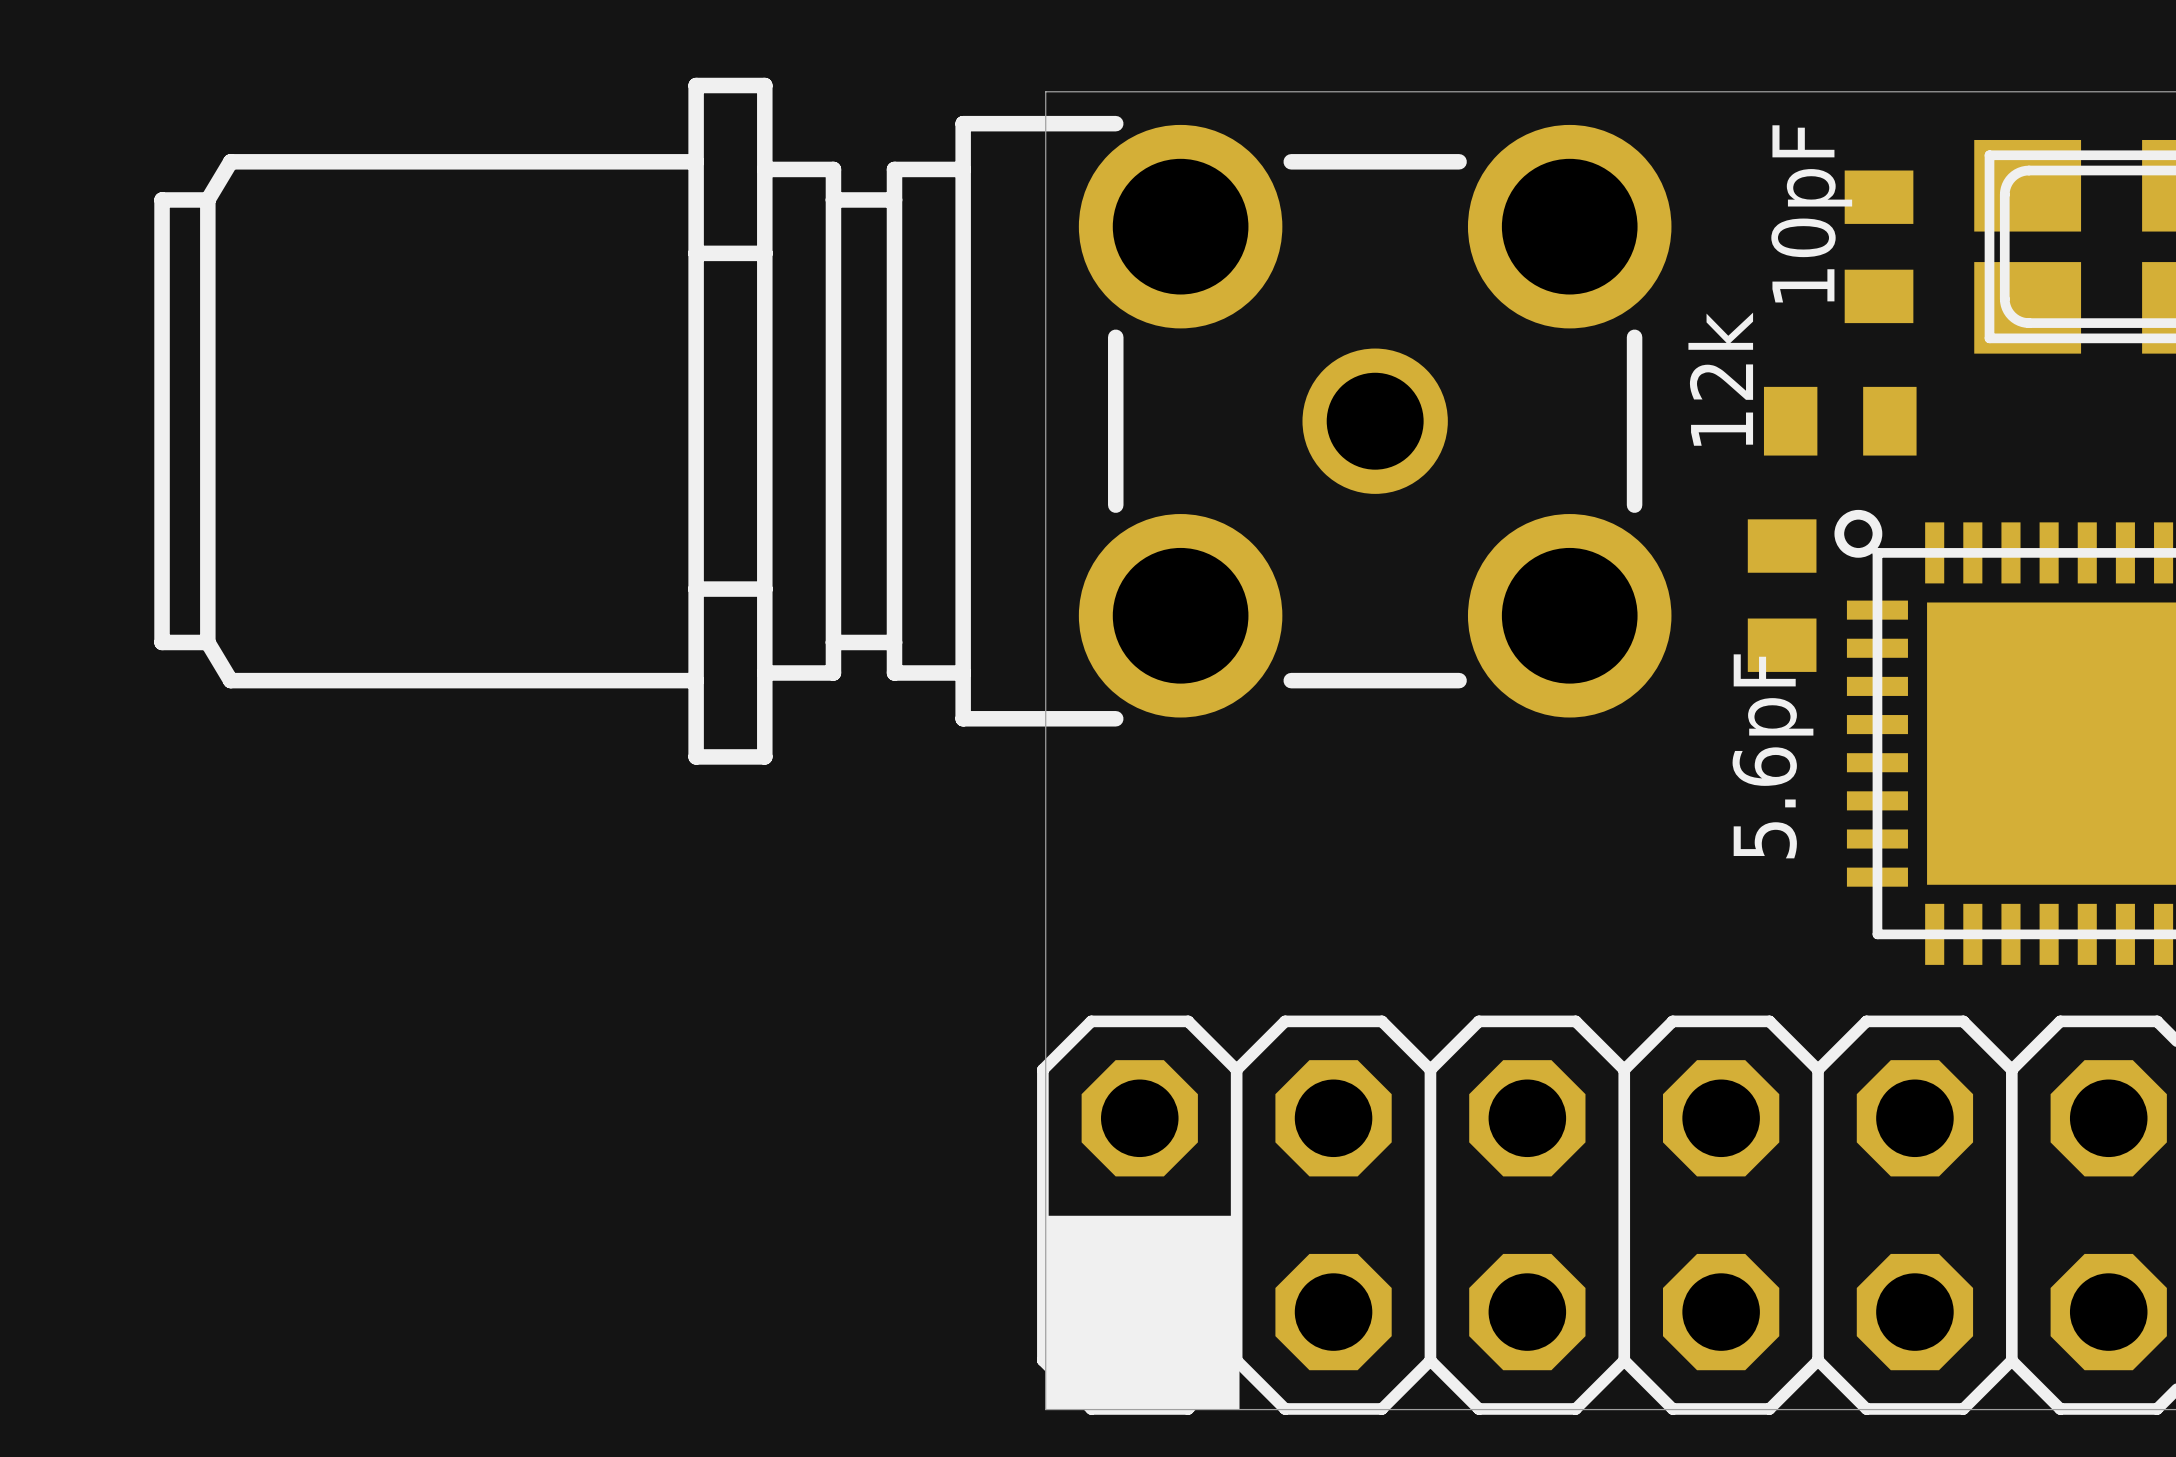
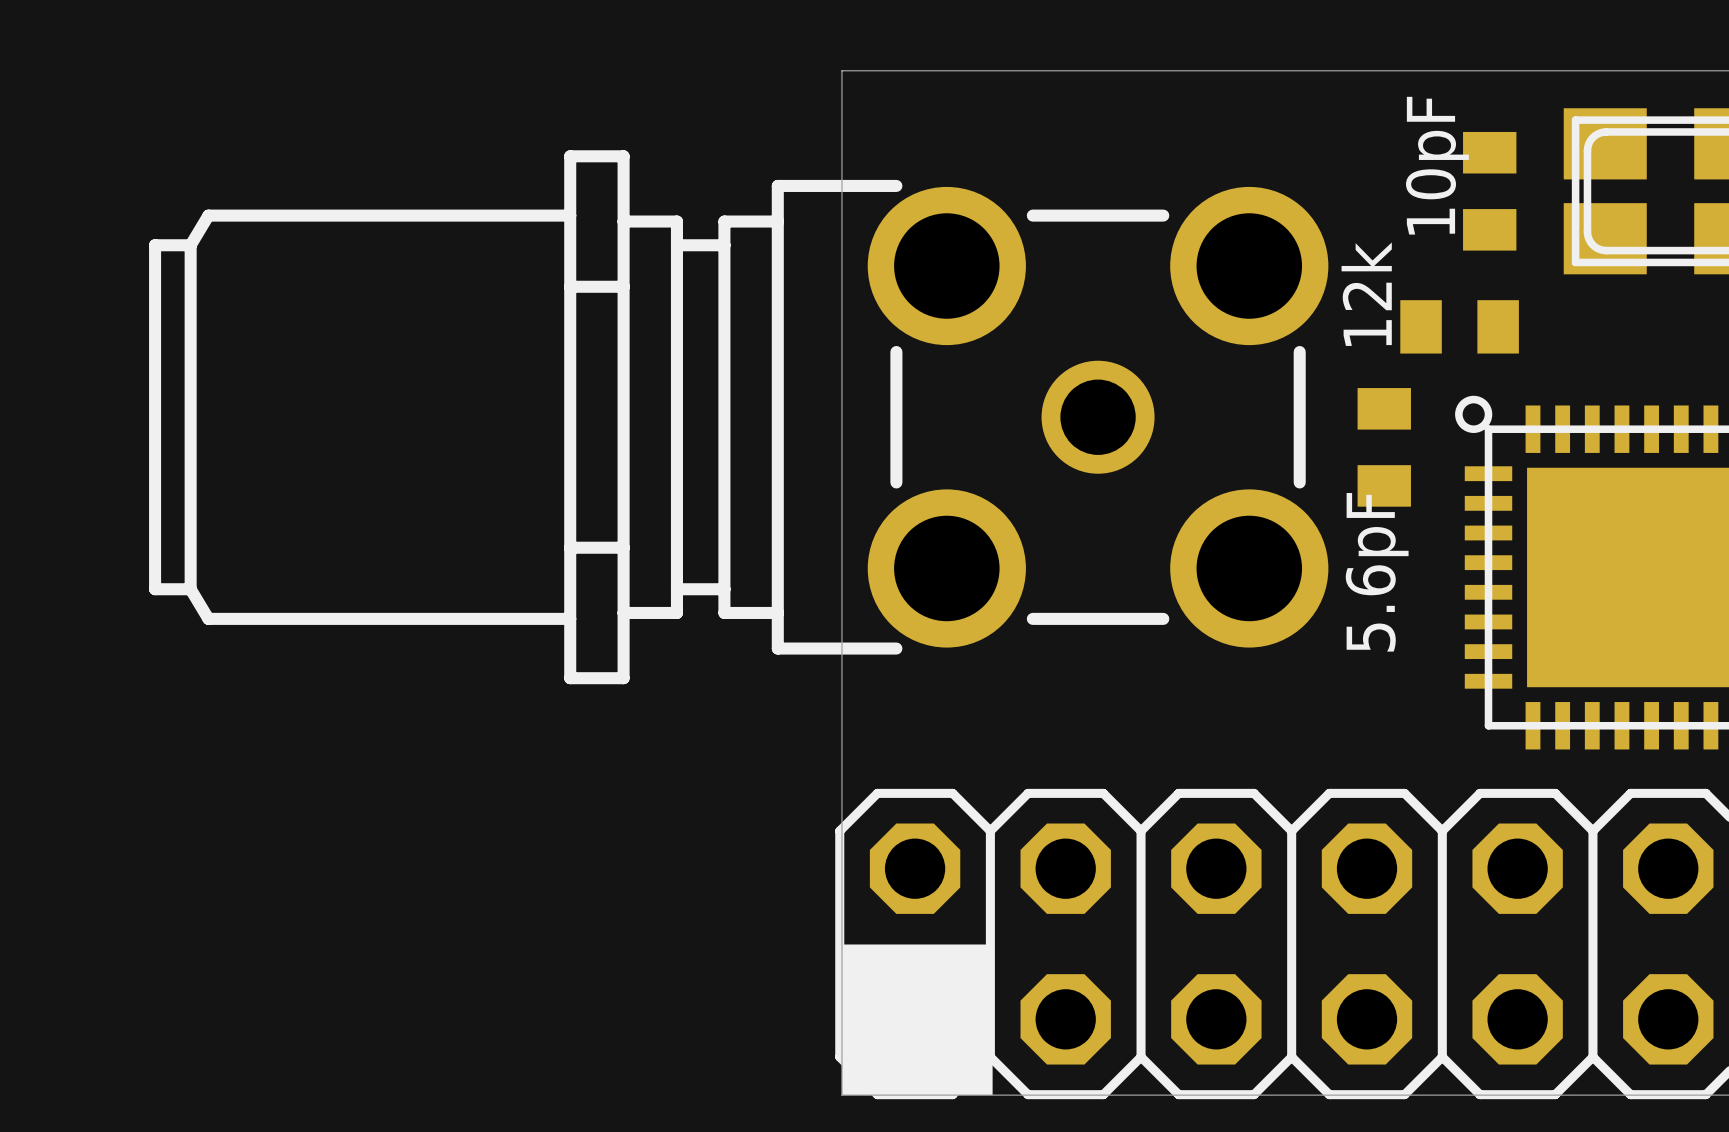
part position: (912, 421) -> (738, 417)
part position: (1782, 595) -> (1384, 447)

